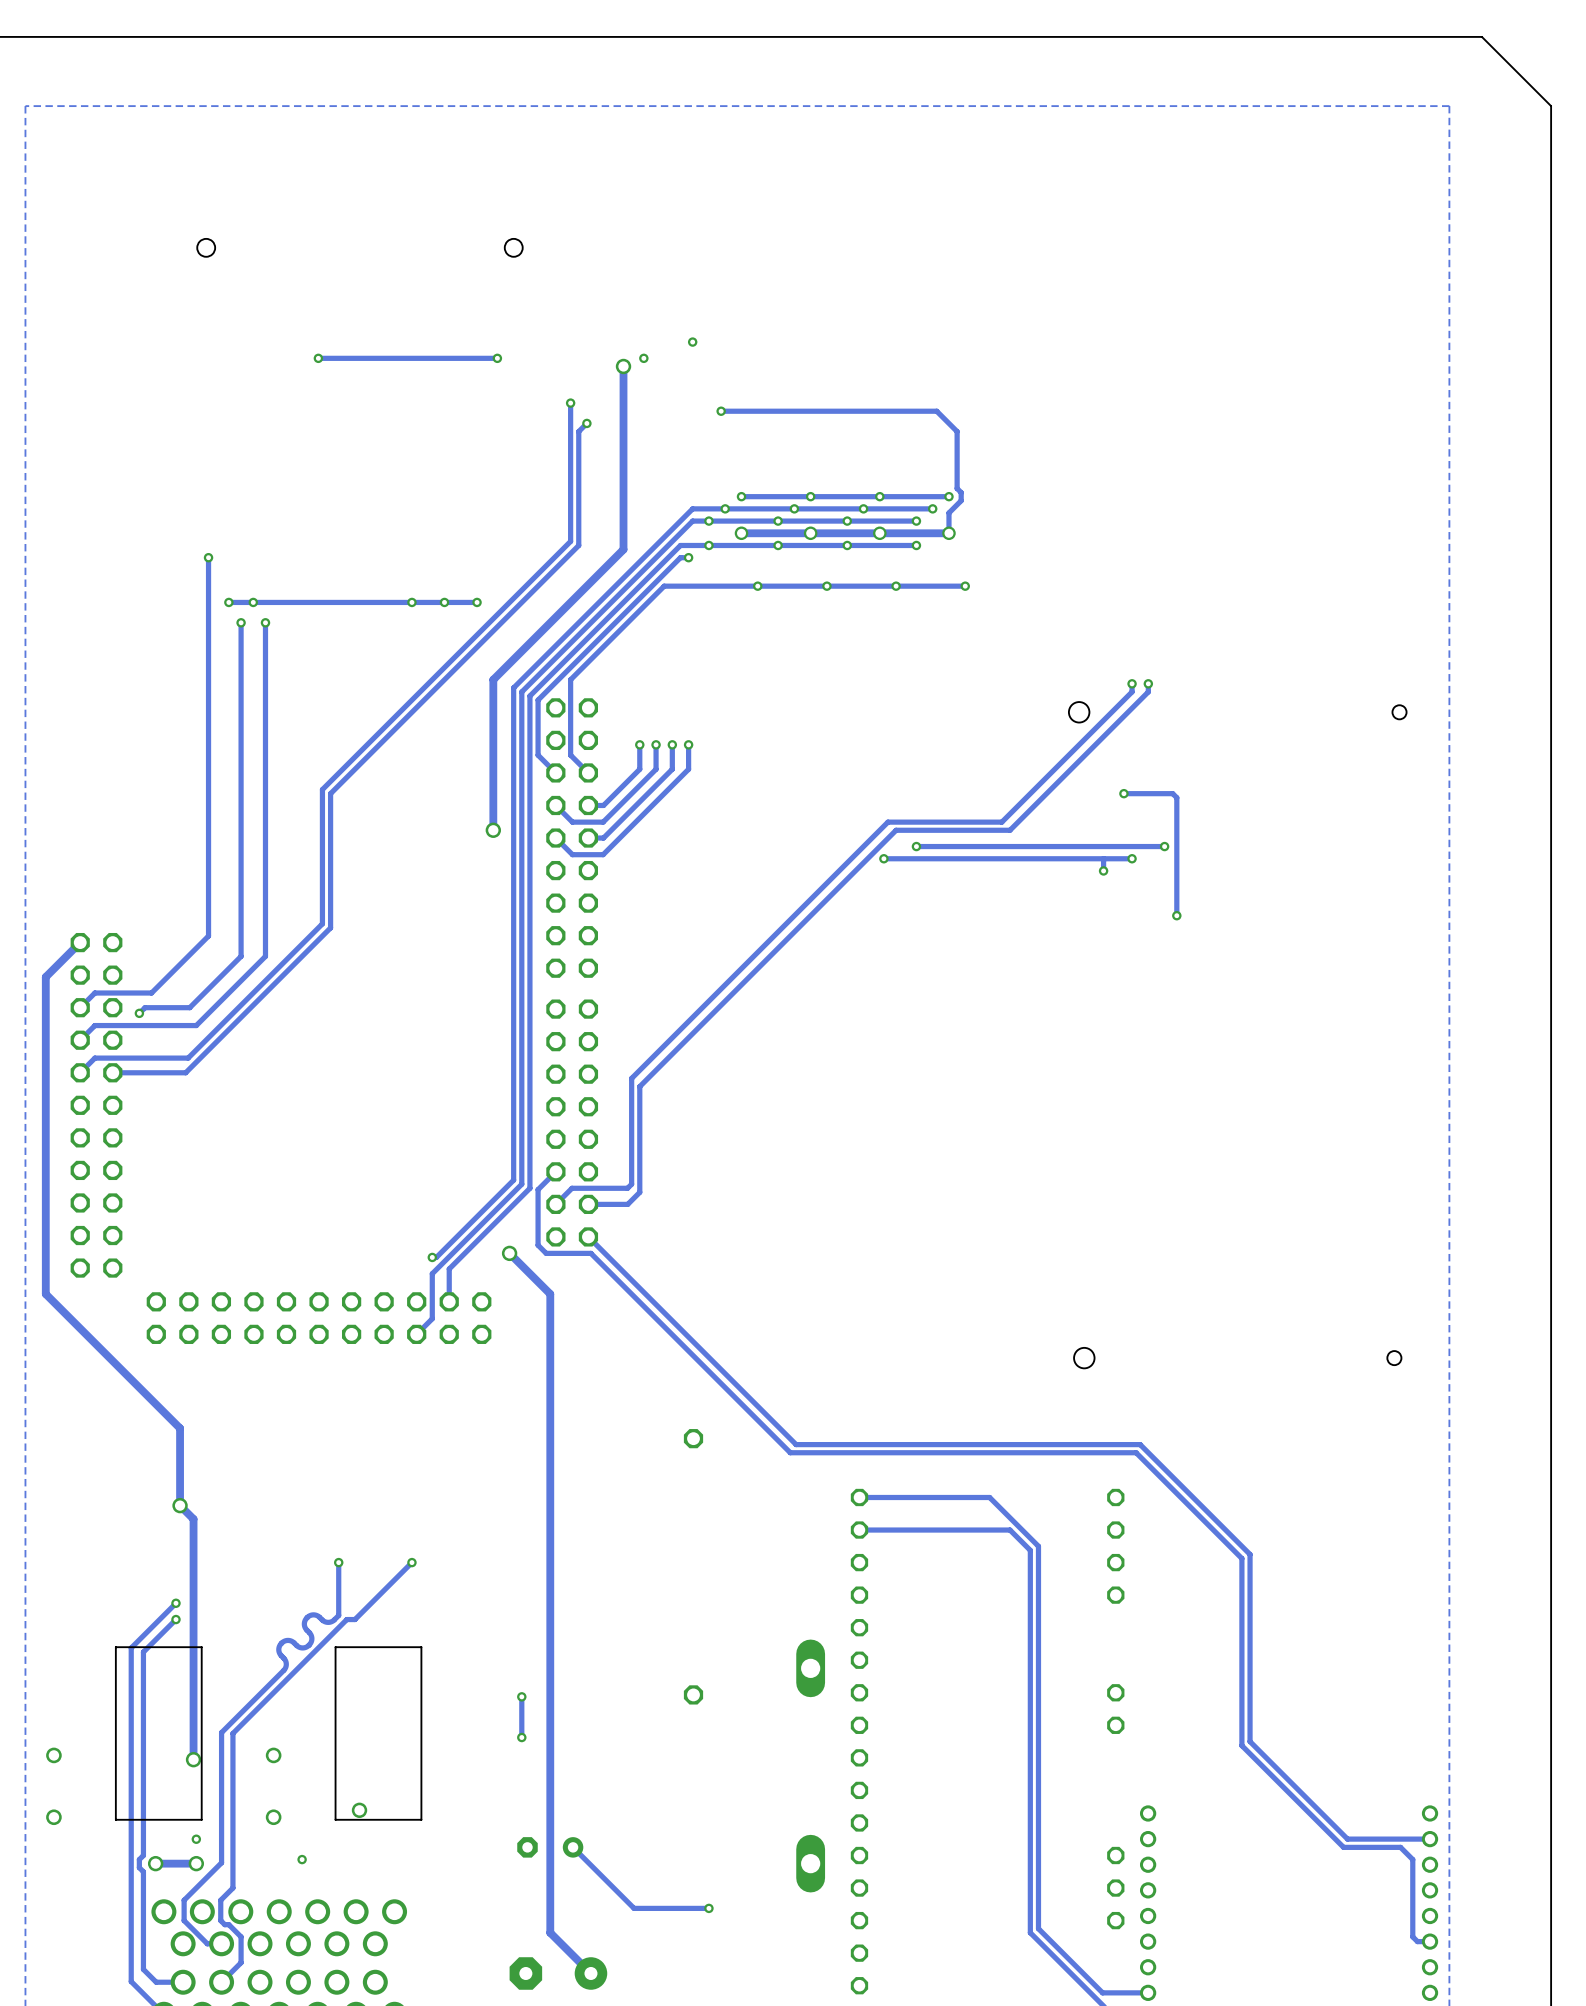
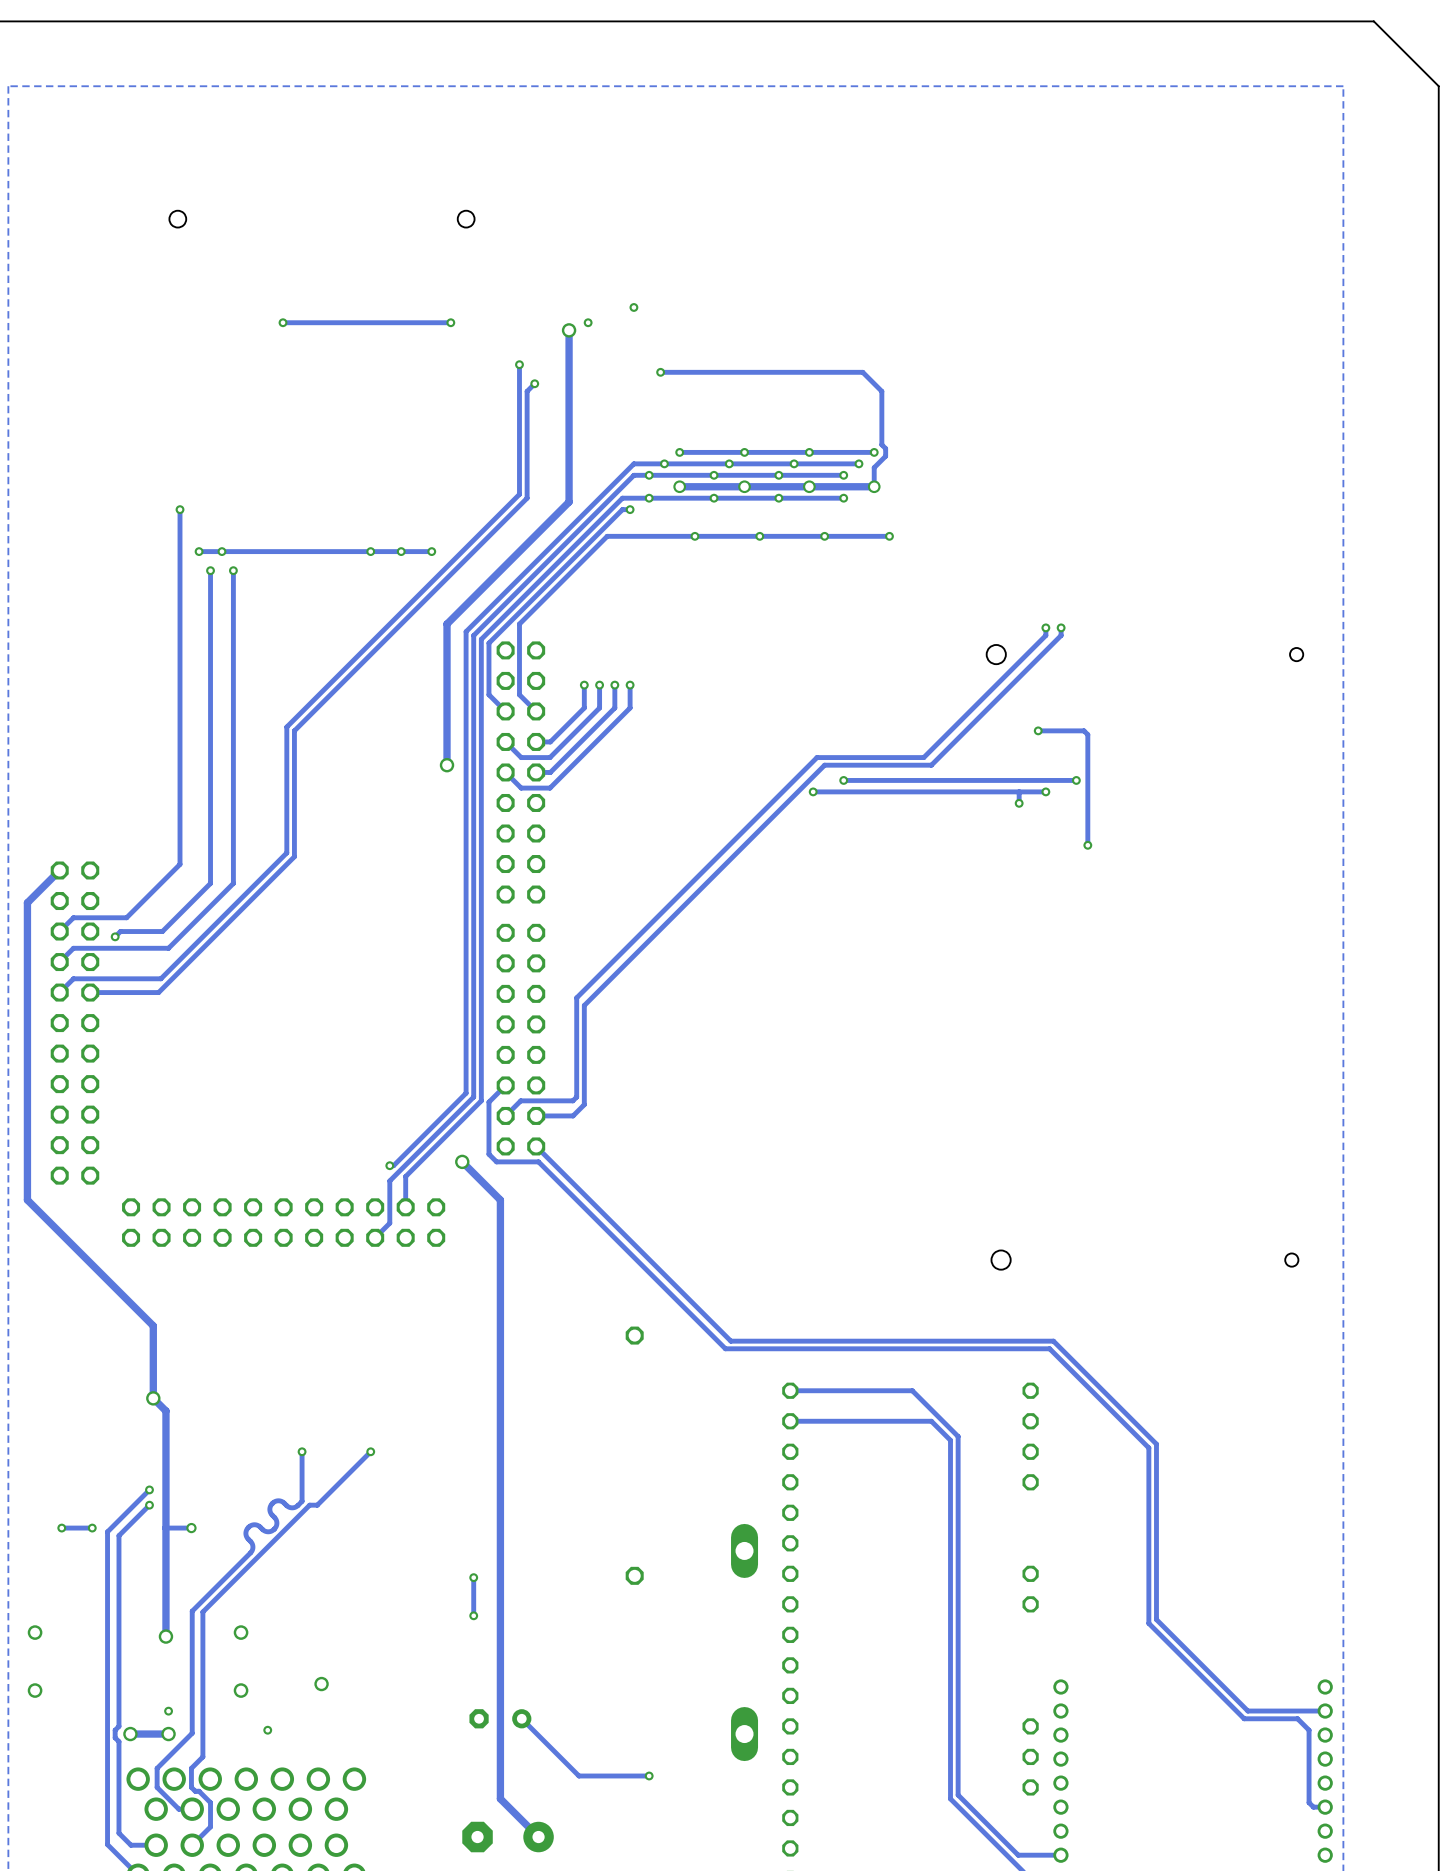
via: none -> (61, 1528)
track: none -> (92, 1528) (61, 1528)
via: none -> (92, 1528)
track: none -> (191, 1528) (165, 1528)
via: none -> (191, 1528)
part: (158, 1733) -> none
part: (378, 1733) -> none

